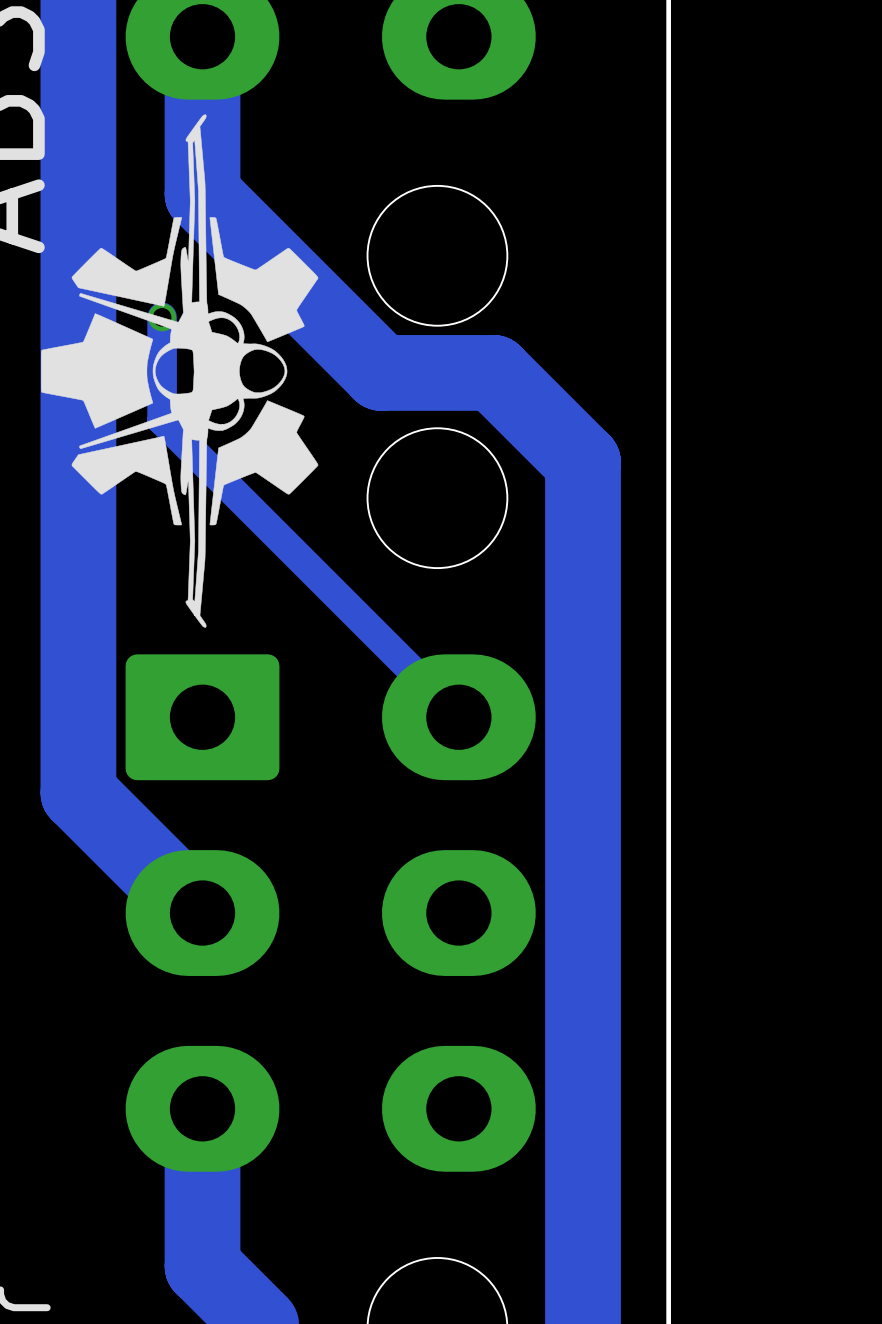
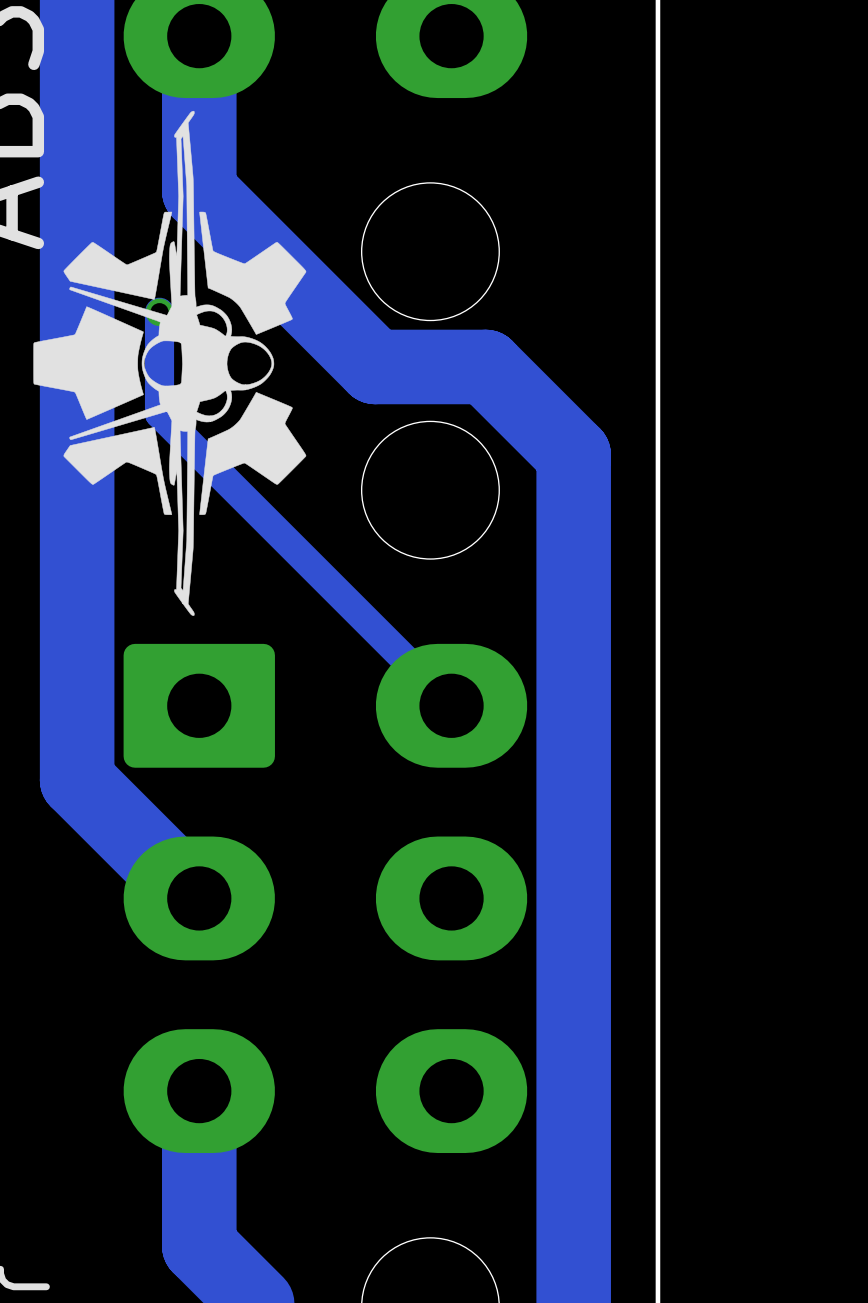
drawing shape: [40, 114, 319, 628] -> [33, 110, 307, 616]

